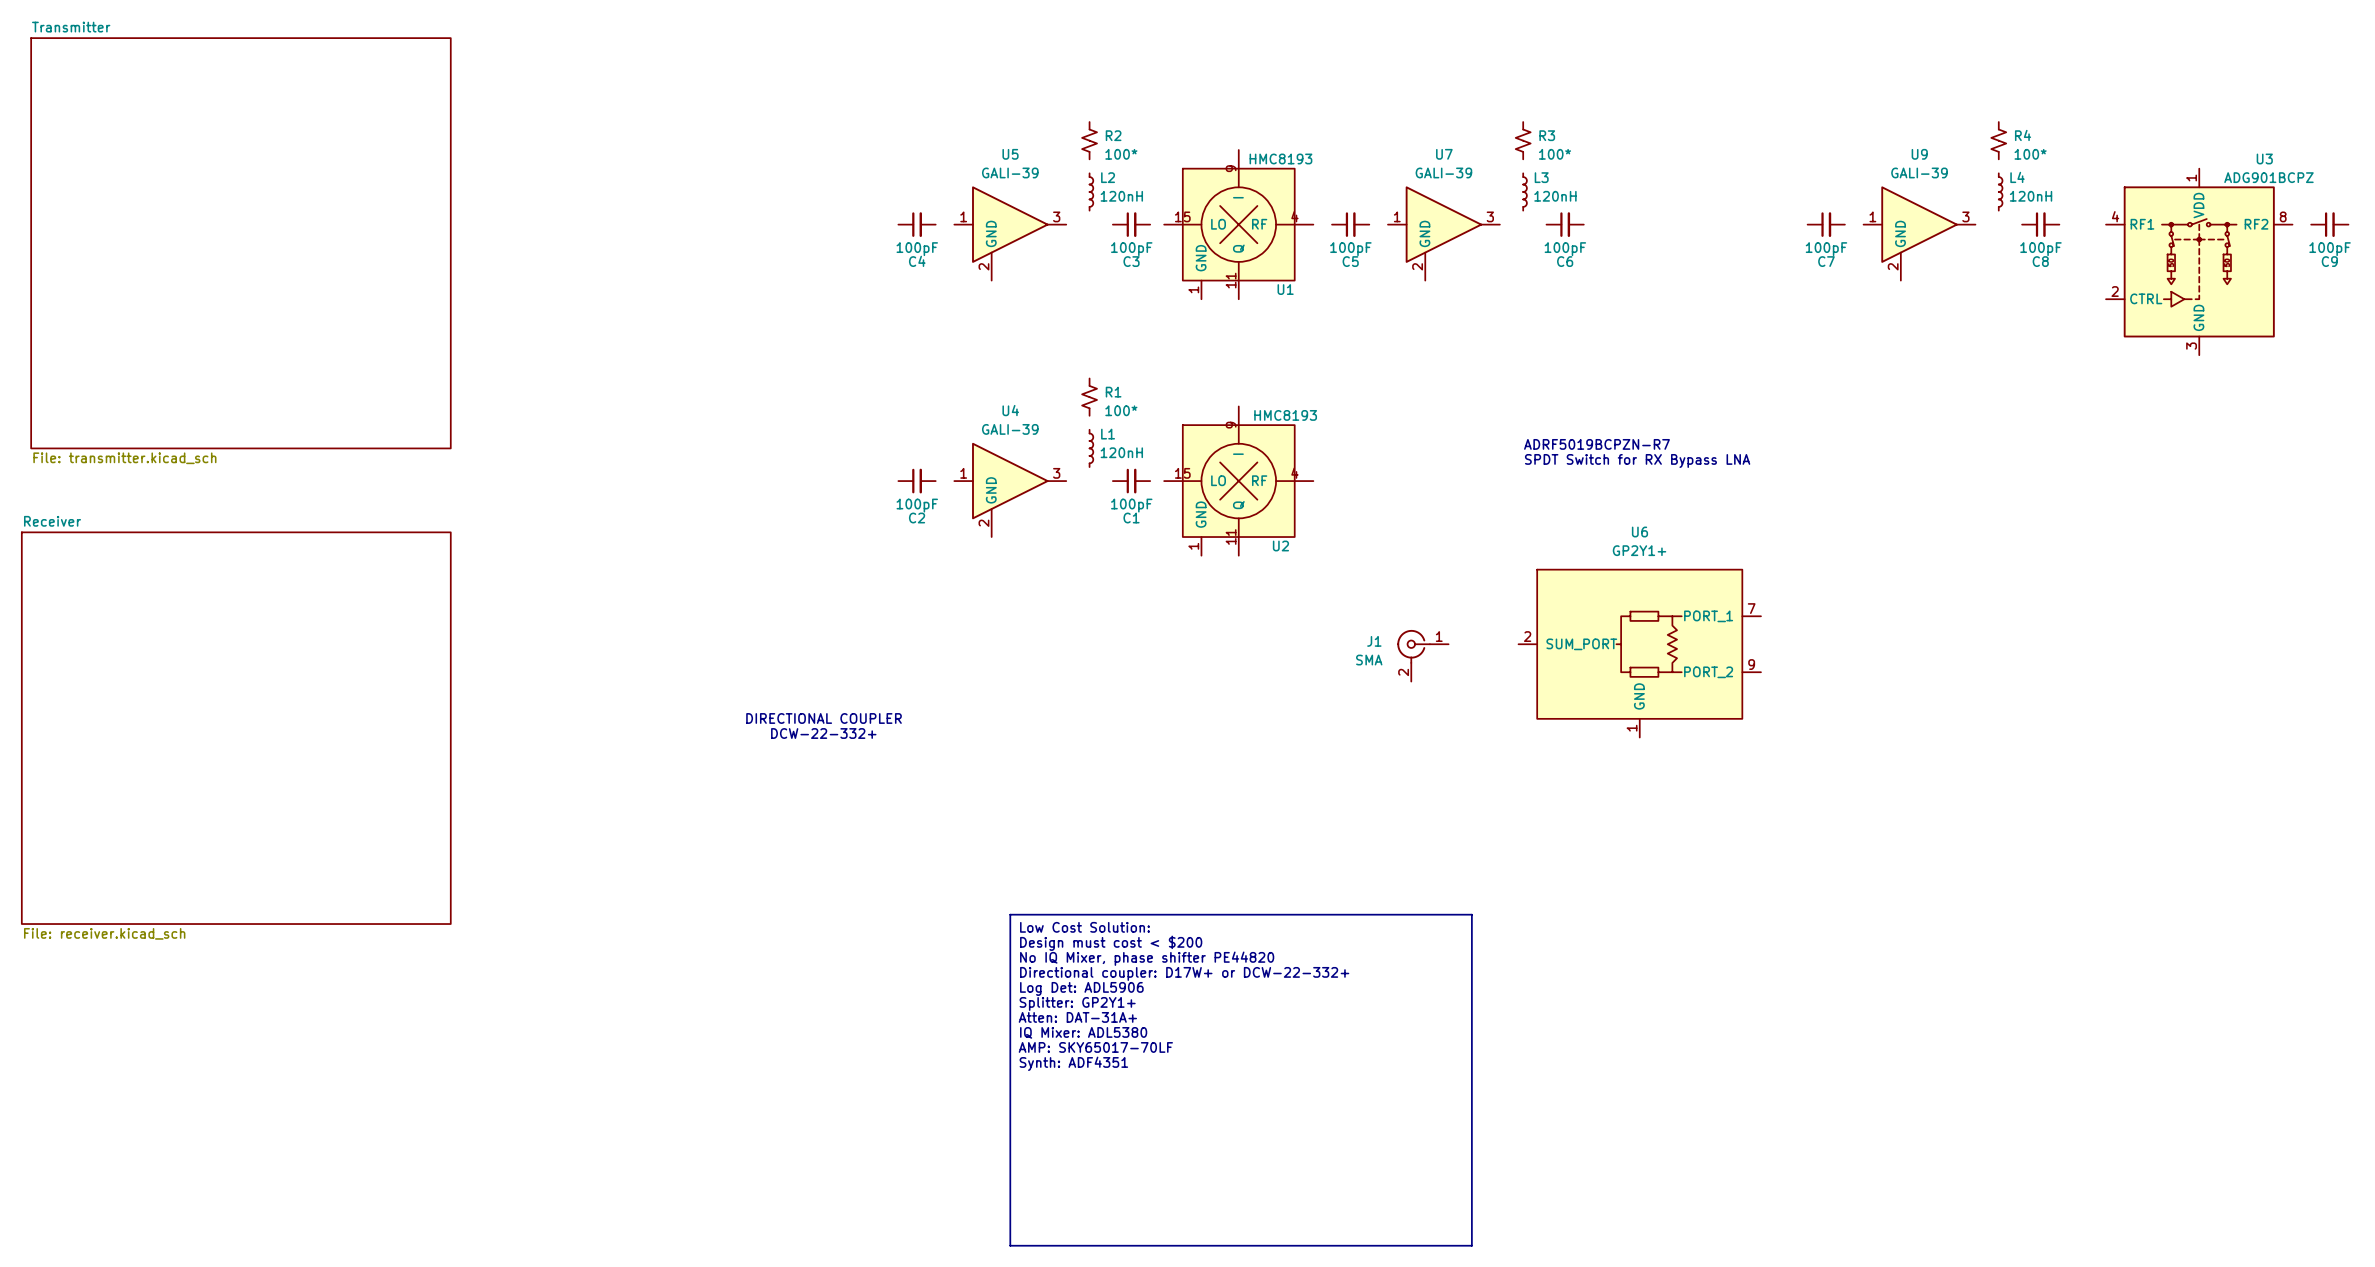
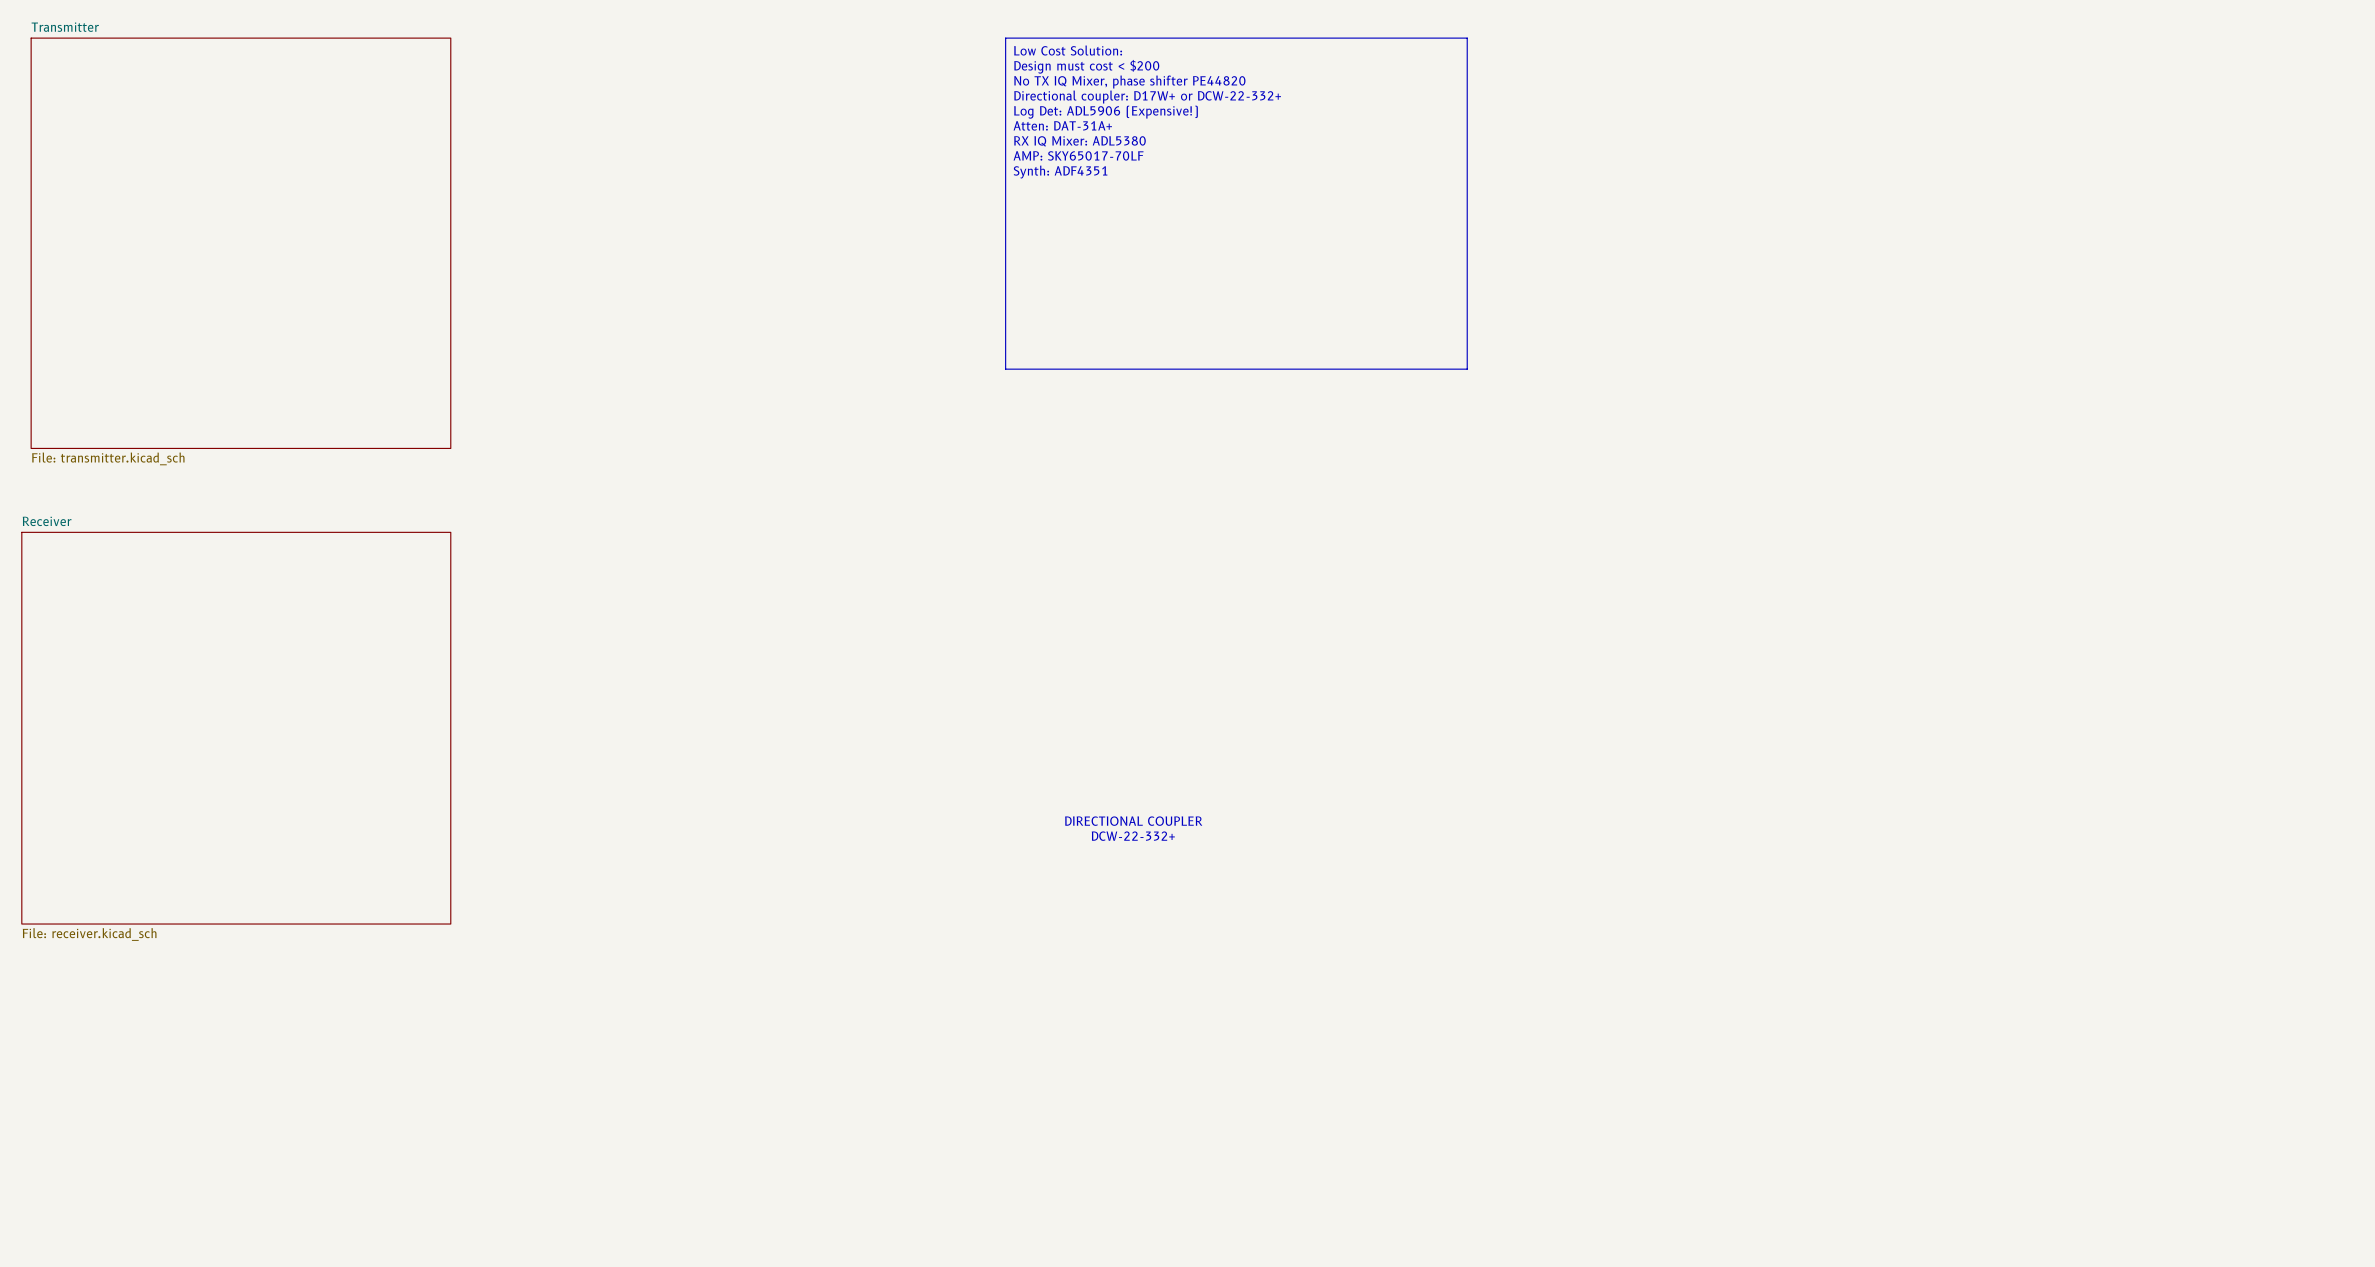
line: none -> (1005, 38) (1467, 38) (1467, 369) (1005, 369) (1005, 38)
text: none -> Low Cost Solution: (1068, 50)
text: none -> Design must cost < $200 (1086, 66)
text: none -> No TX IQ Mixer, phase shifter PE44820 (1129, 82)
text: none -> Directional coupler: D17W+ or DCW-22-332+ (1147, 97)
text: none -> Log Det: ADL5906 (Expensive!) (1106, 112)
text: none -> Atten: DAT-31A+ (1062, 125)
R2: 100* (1089, 140) -> none
R3: 100* (1523, 140) -> none
R4: 100* (1998, 140) -> none
text: none -> RX IQ Mixer: ADL5380 (1079, 141)
text: none -> AMP: SKY65017-70LF (1078, 155)
text: none -> Synth: ADF4351 (1060, 172)
L2: 120nH (1091, 191) -> none
L3: 120nH (1525, 191) -> none
L4: 120nH (2000, 191) -> none
C4: 100pF (917, 224) -> none
C3: 100pF (1131, 224) -> none
U1: HMC8193 (1238, 224) -> none
C5: 100pF (1350, 224) -> none
C6: 100pF (1565, 224) -> none
C7: 100pF (1826, 224) -> none
C8: 100pF (2040, 224) -> none
C9: 100pF (2329, 224) -> none
U5: GALI-39 (1010, 233) -> none
U7: GALI-39 (1443, 233) -> none
U9: GALI-39 (1919, 233) -> none
U3: ADG901BCPZ (2199, 261) -> none
R1: 100* (1089, 397) -> none
text: ADRF5019BCPZN-R7 (1596, 444) -> none
L1: 120nH (1091, 448) -> none
text: SPDT Switch for RX Bypass LNA (1637, 460) -> none
C2: 100pF (917, 481) -> none
C1: 100pF (1131, 481) -> none
U2: HMC8193 (1238, 481) -> none
U4: GALI-39 (1010, 489) -> none
U6: GP2Y1+ (1639, 653) -> none
J1: SMA (1422, 655) -> none
text: DIRECTIONAL COUPLER (824, 718) -> none
text: DCW-22-332+ (823, 733) -> none
text: none -> DIRECTIONAL COUPLER (1133, 821)
text: none -> DCW-22-332+ (1133, 836)
line: (1010, 914) (1471, 914) (1471, 1245) (1010, 1245) (1010, 914) -> none
text: Low Cost Solution: (1084, 927) -> none
text: Design must cost < $200 (1111, 943) -> none
text: No IQ Mixer, phase shifter PE44820 (1147, 958) -> none
text: Directional coupler: D17W+ or DCW-22-332+ (1184, 973) -> none
text: Log Det: ADL5906 (1081, 988) -> none
text: Splitter: GP2Y1+ (1077, 1003) -> none
text: Atten: DAT-31A+ (1077, 1017) -> none
text: IQ Mixer: ADL5380 (1083, 1032) -> none
text: AMP: SKY65017-70LF (1095, 1047) -> none
text: Synth: ADF4351 (1073, 1063) -> none

